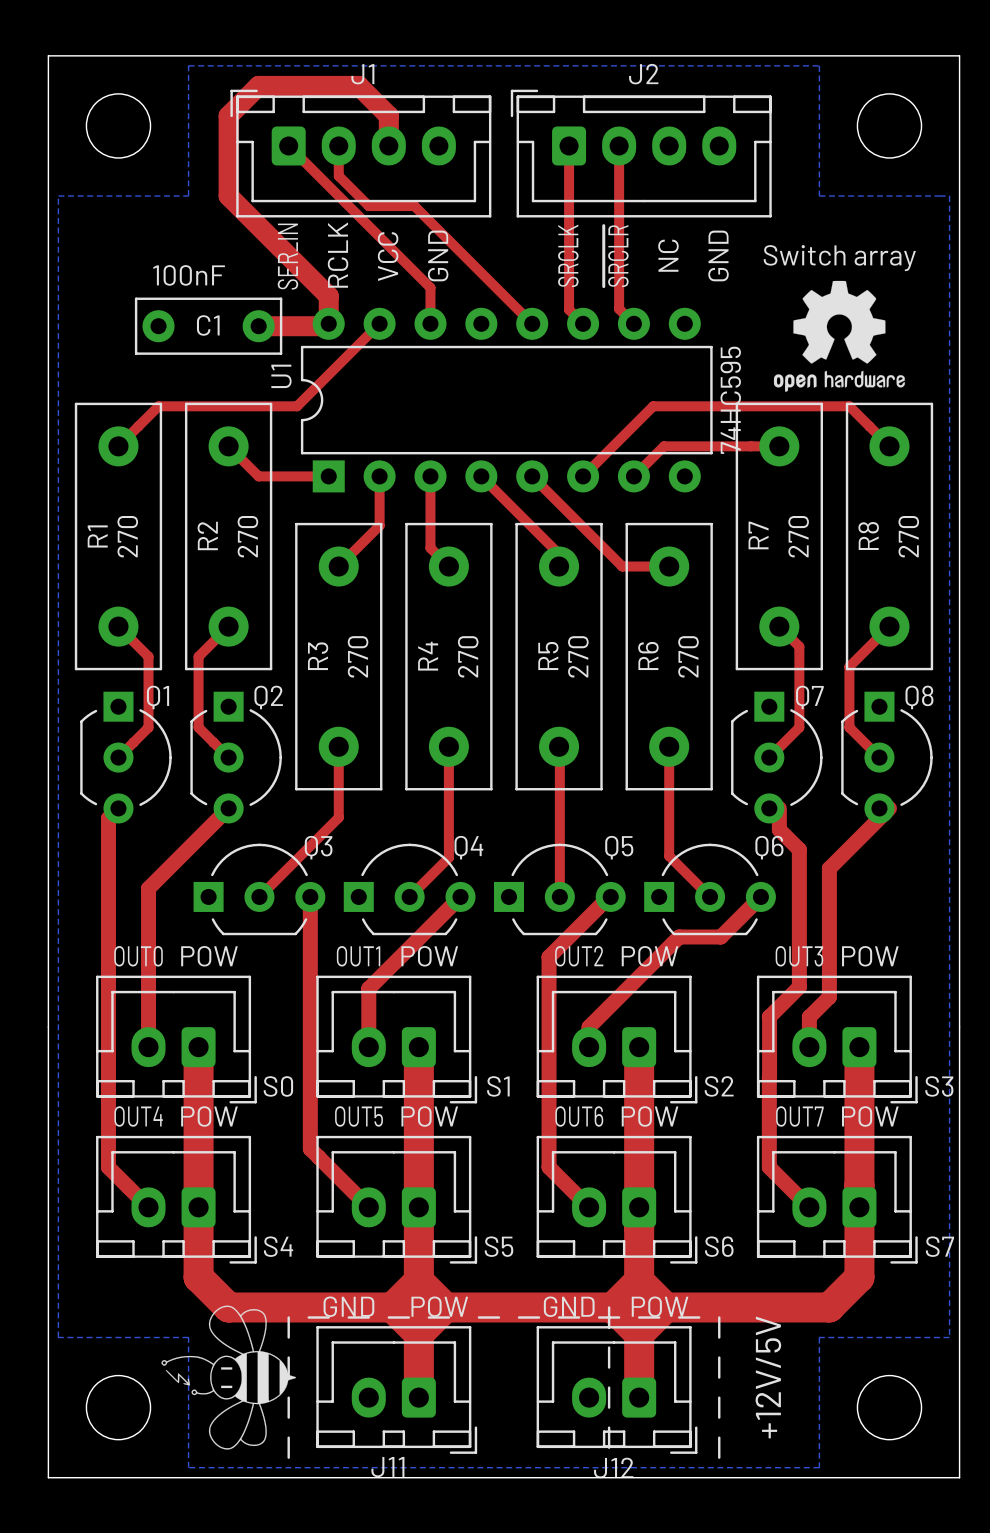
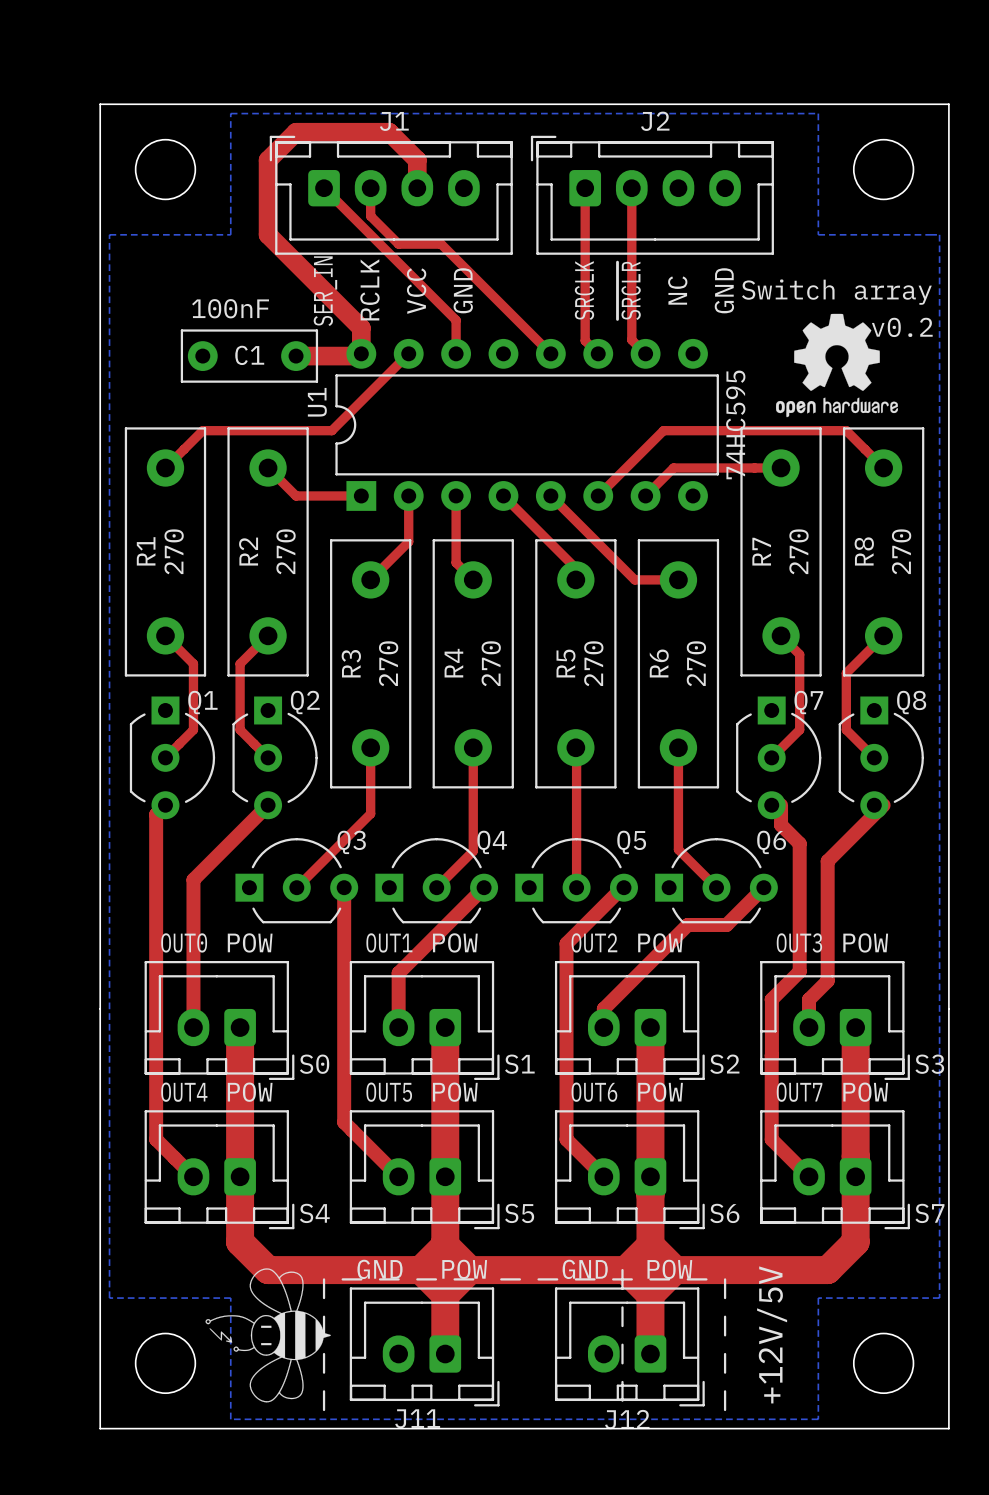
text: none -> v0.2 (902, 327)

